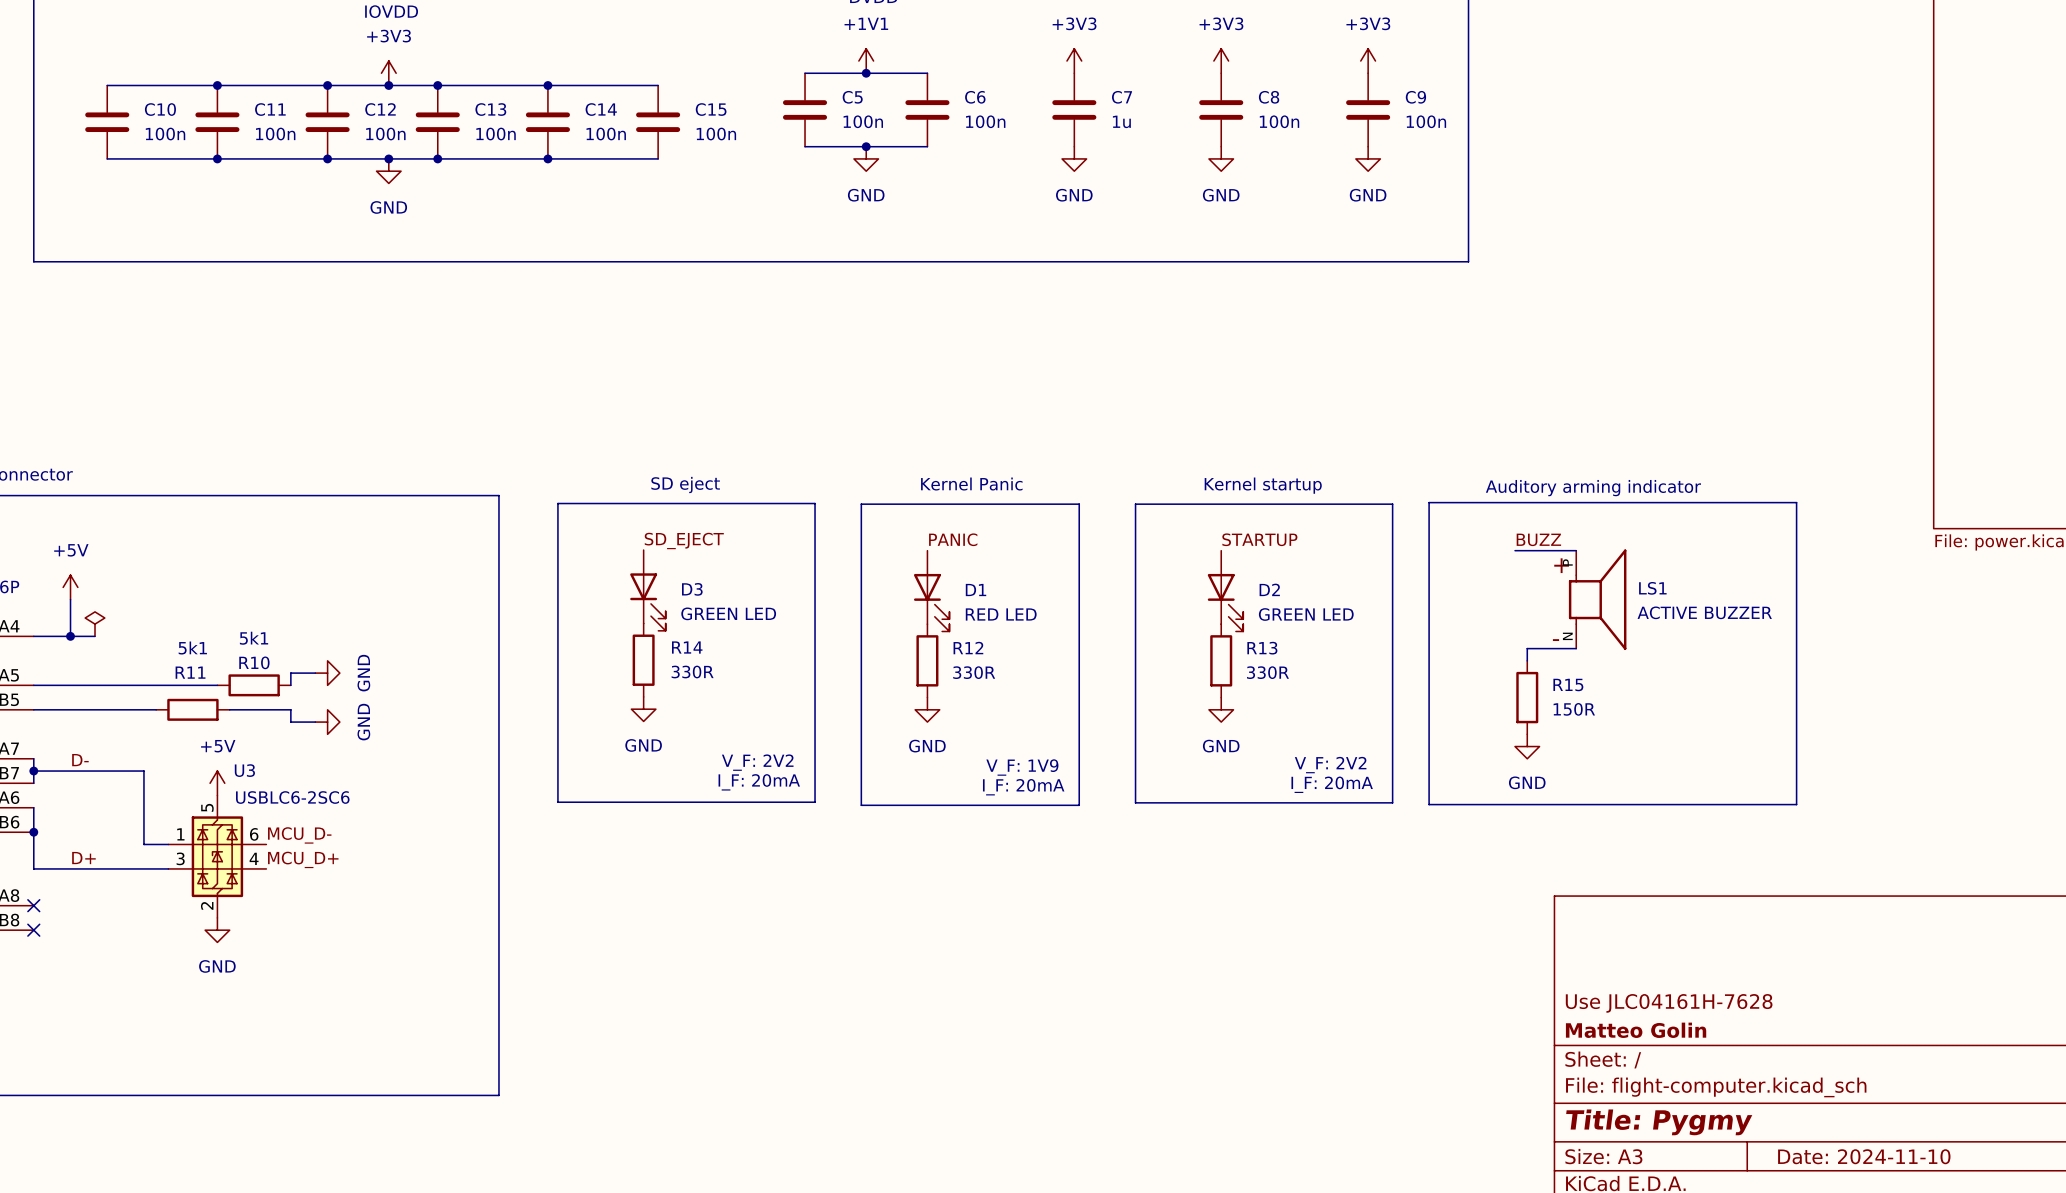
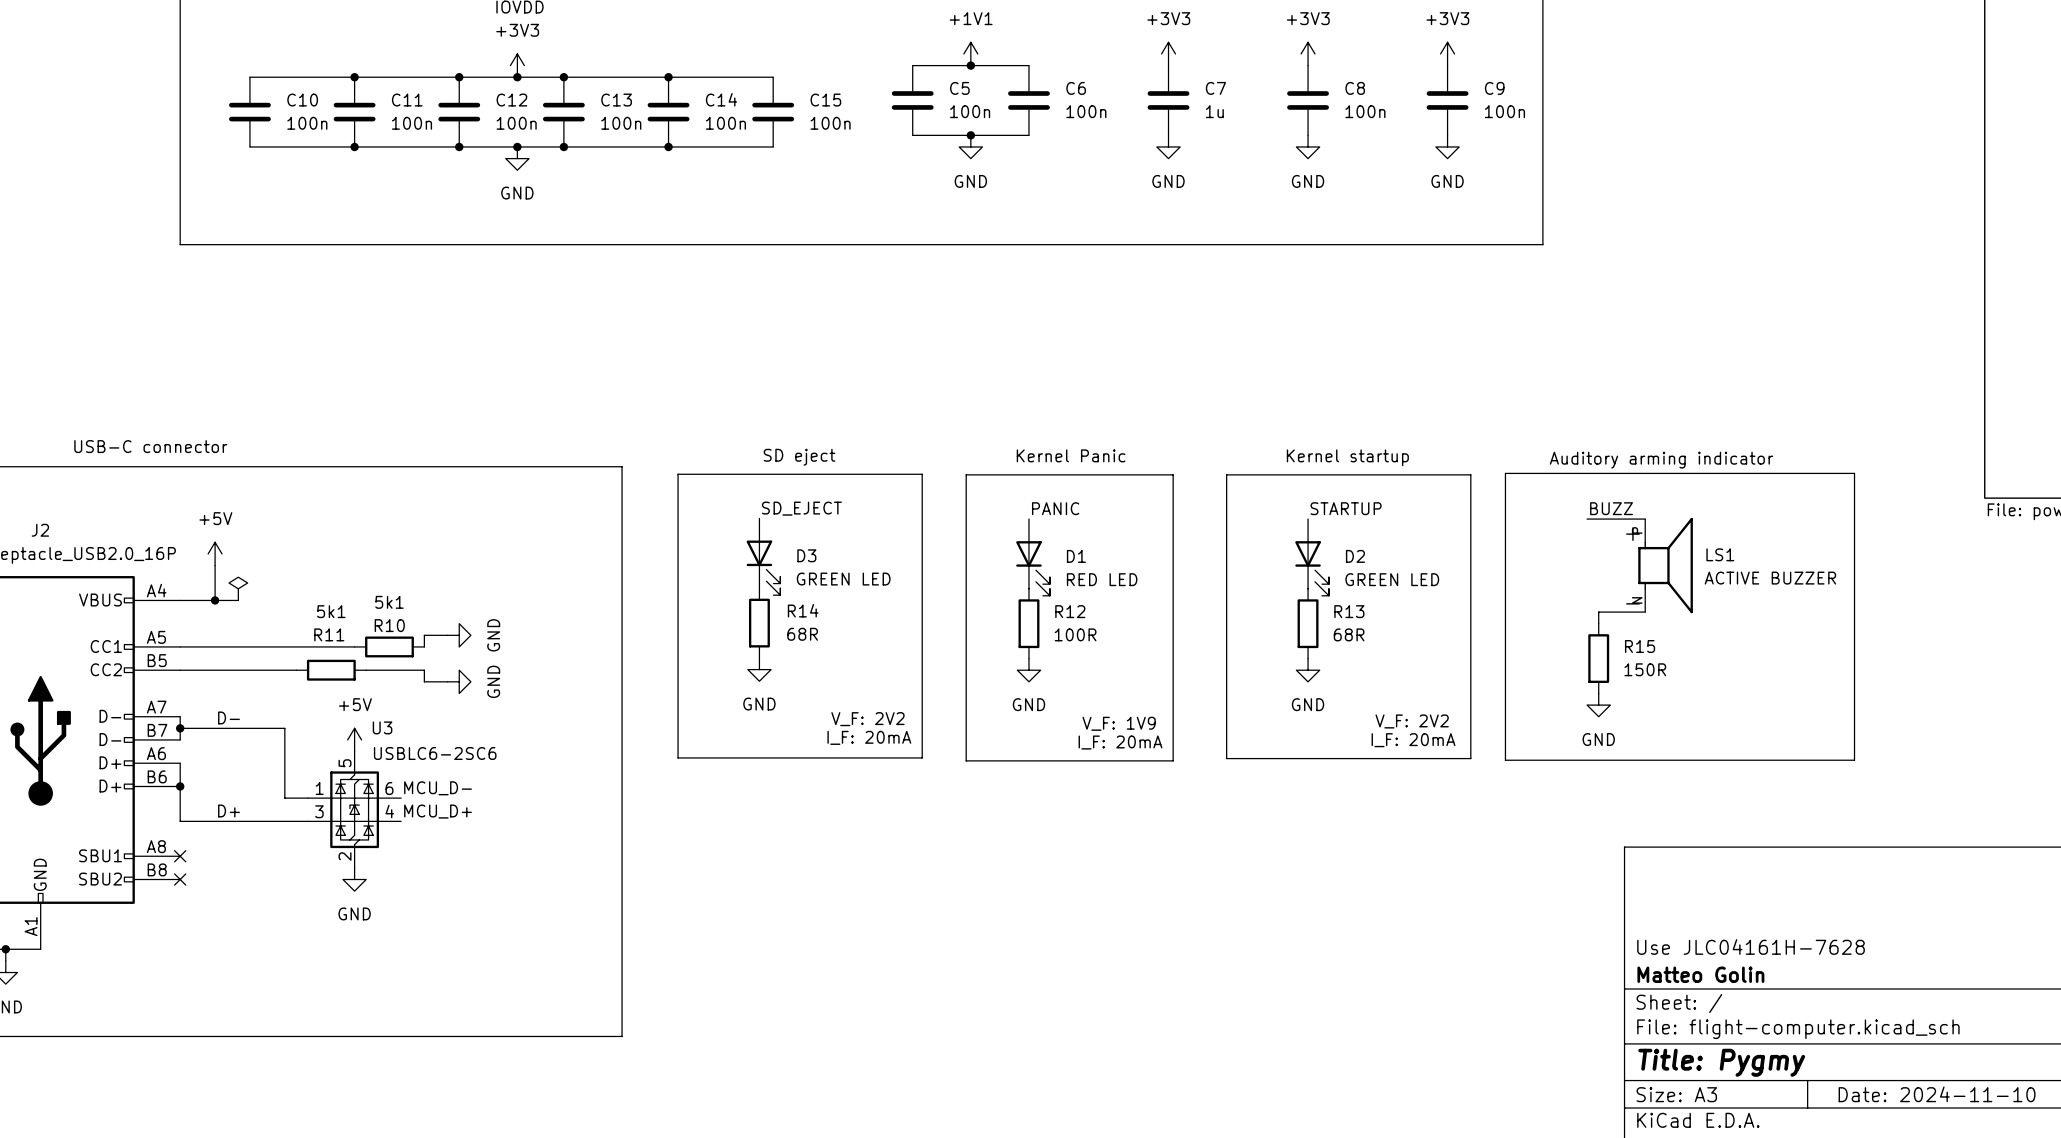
R14 value: 330R (692, 672) -> 68R (802, 634)
R12 value: 330R (974, 672) -> 100R (1075, 634)
R13 value: 330R (1267, 672) -> 68R (1349, 634)

